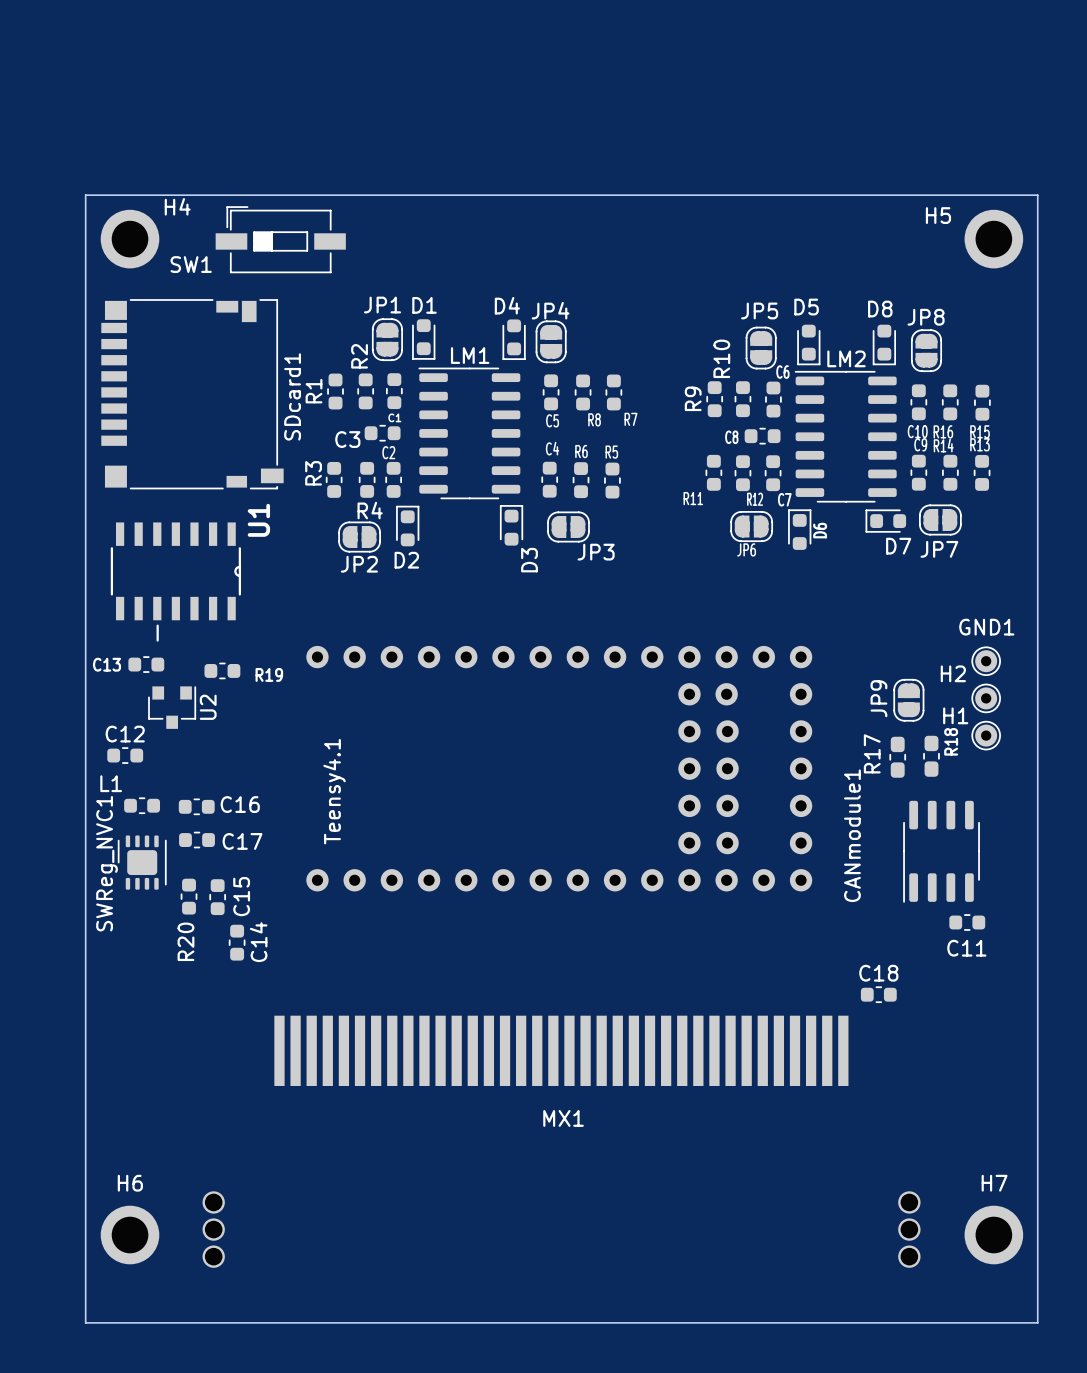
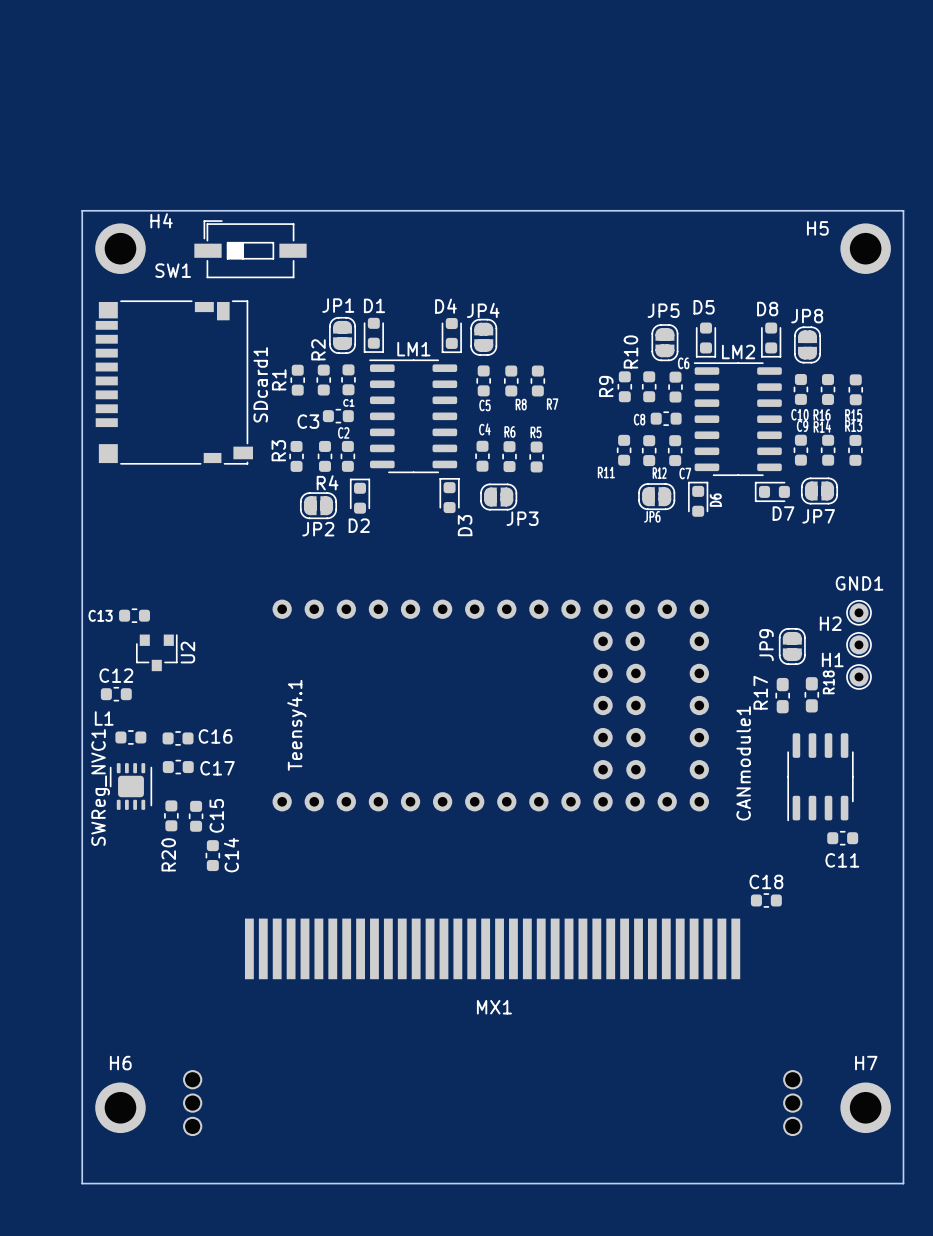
U1: (175, 582) -> none
R19: (222, 670) -> none

